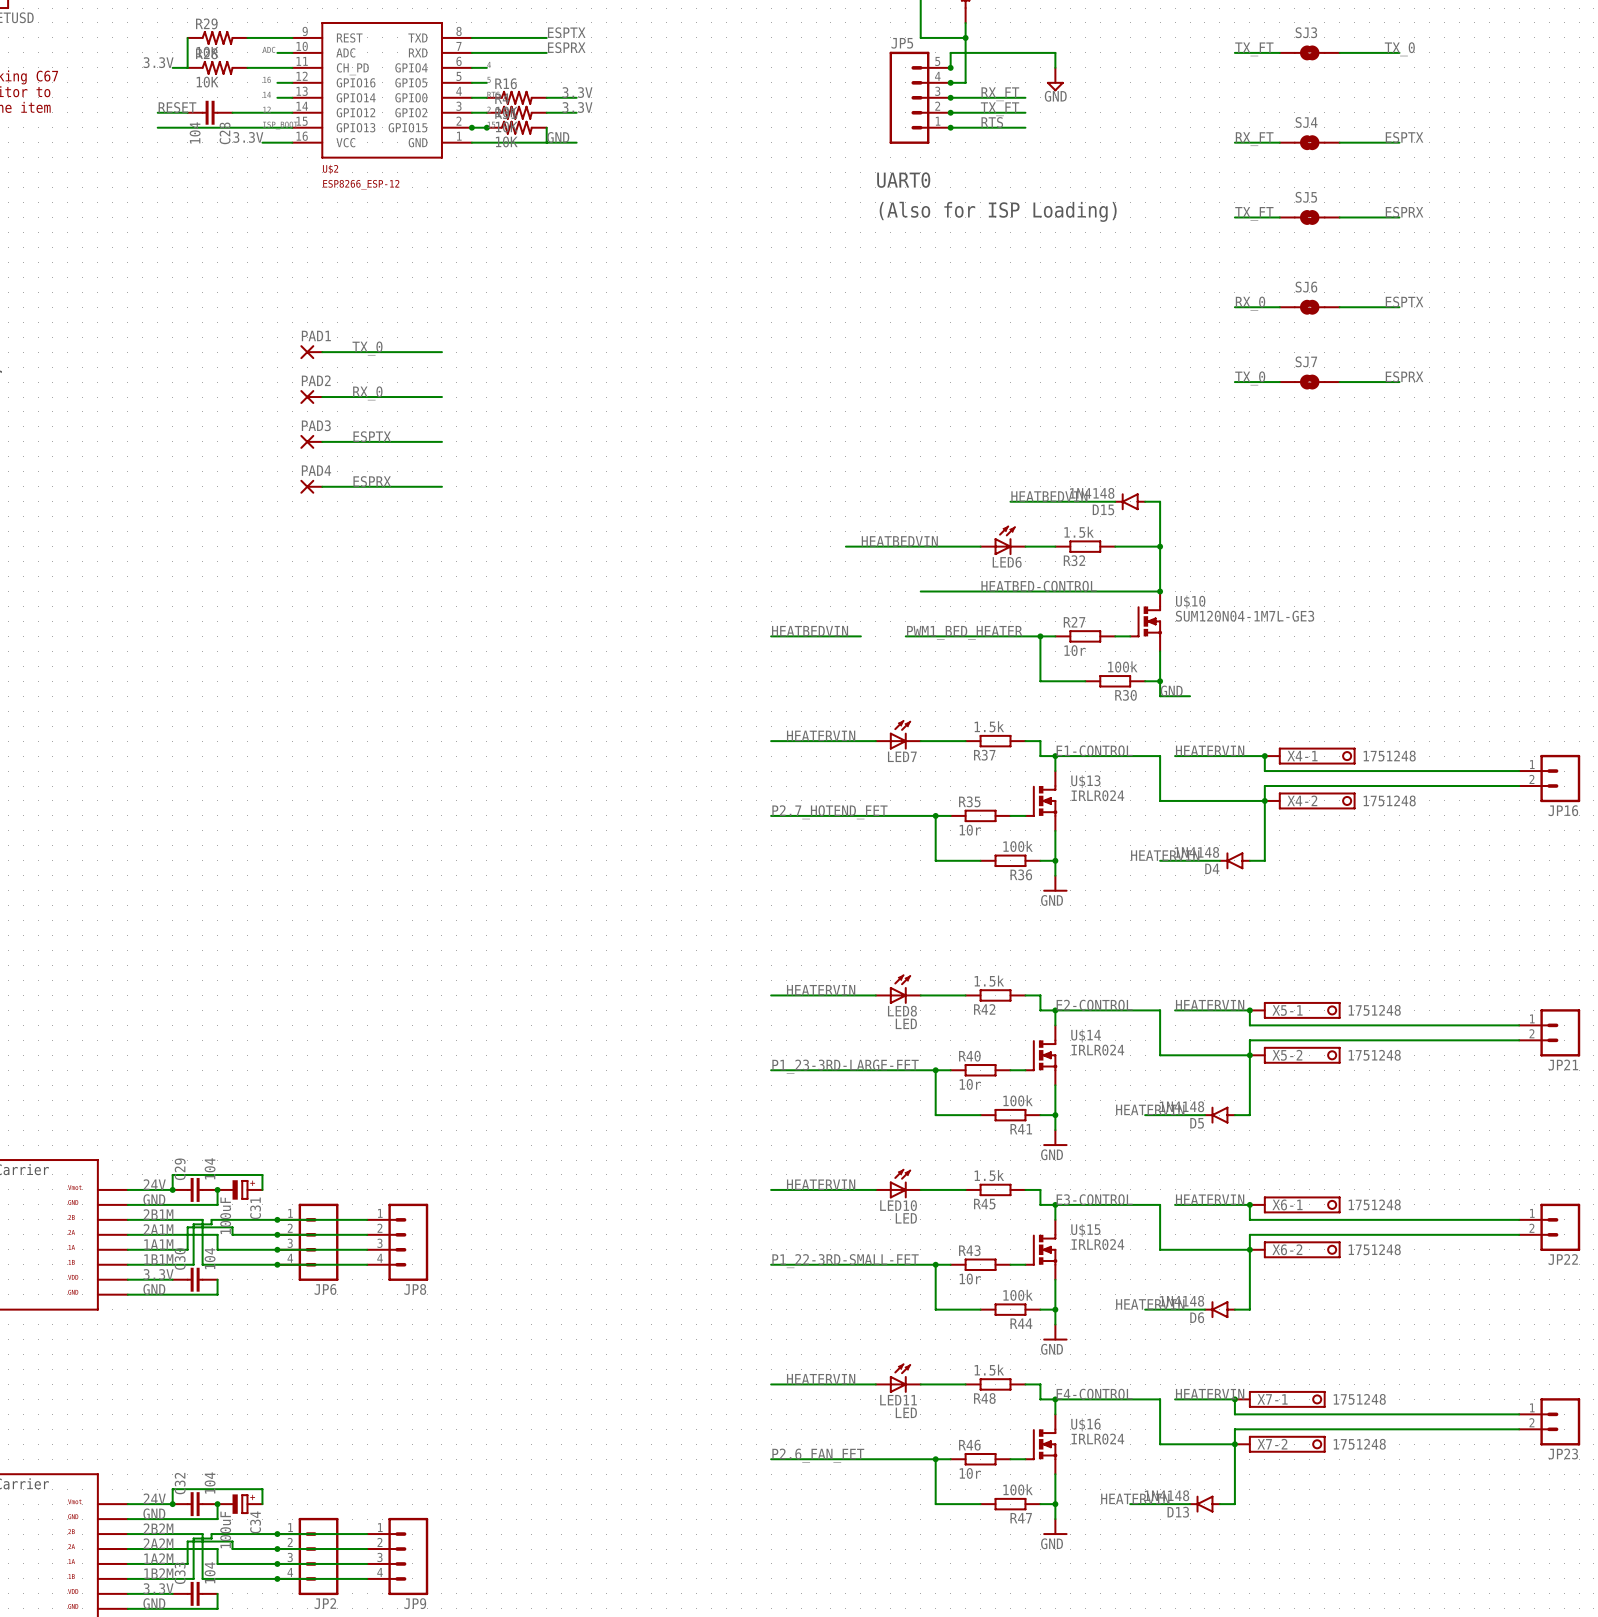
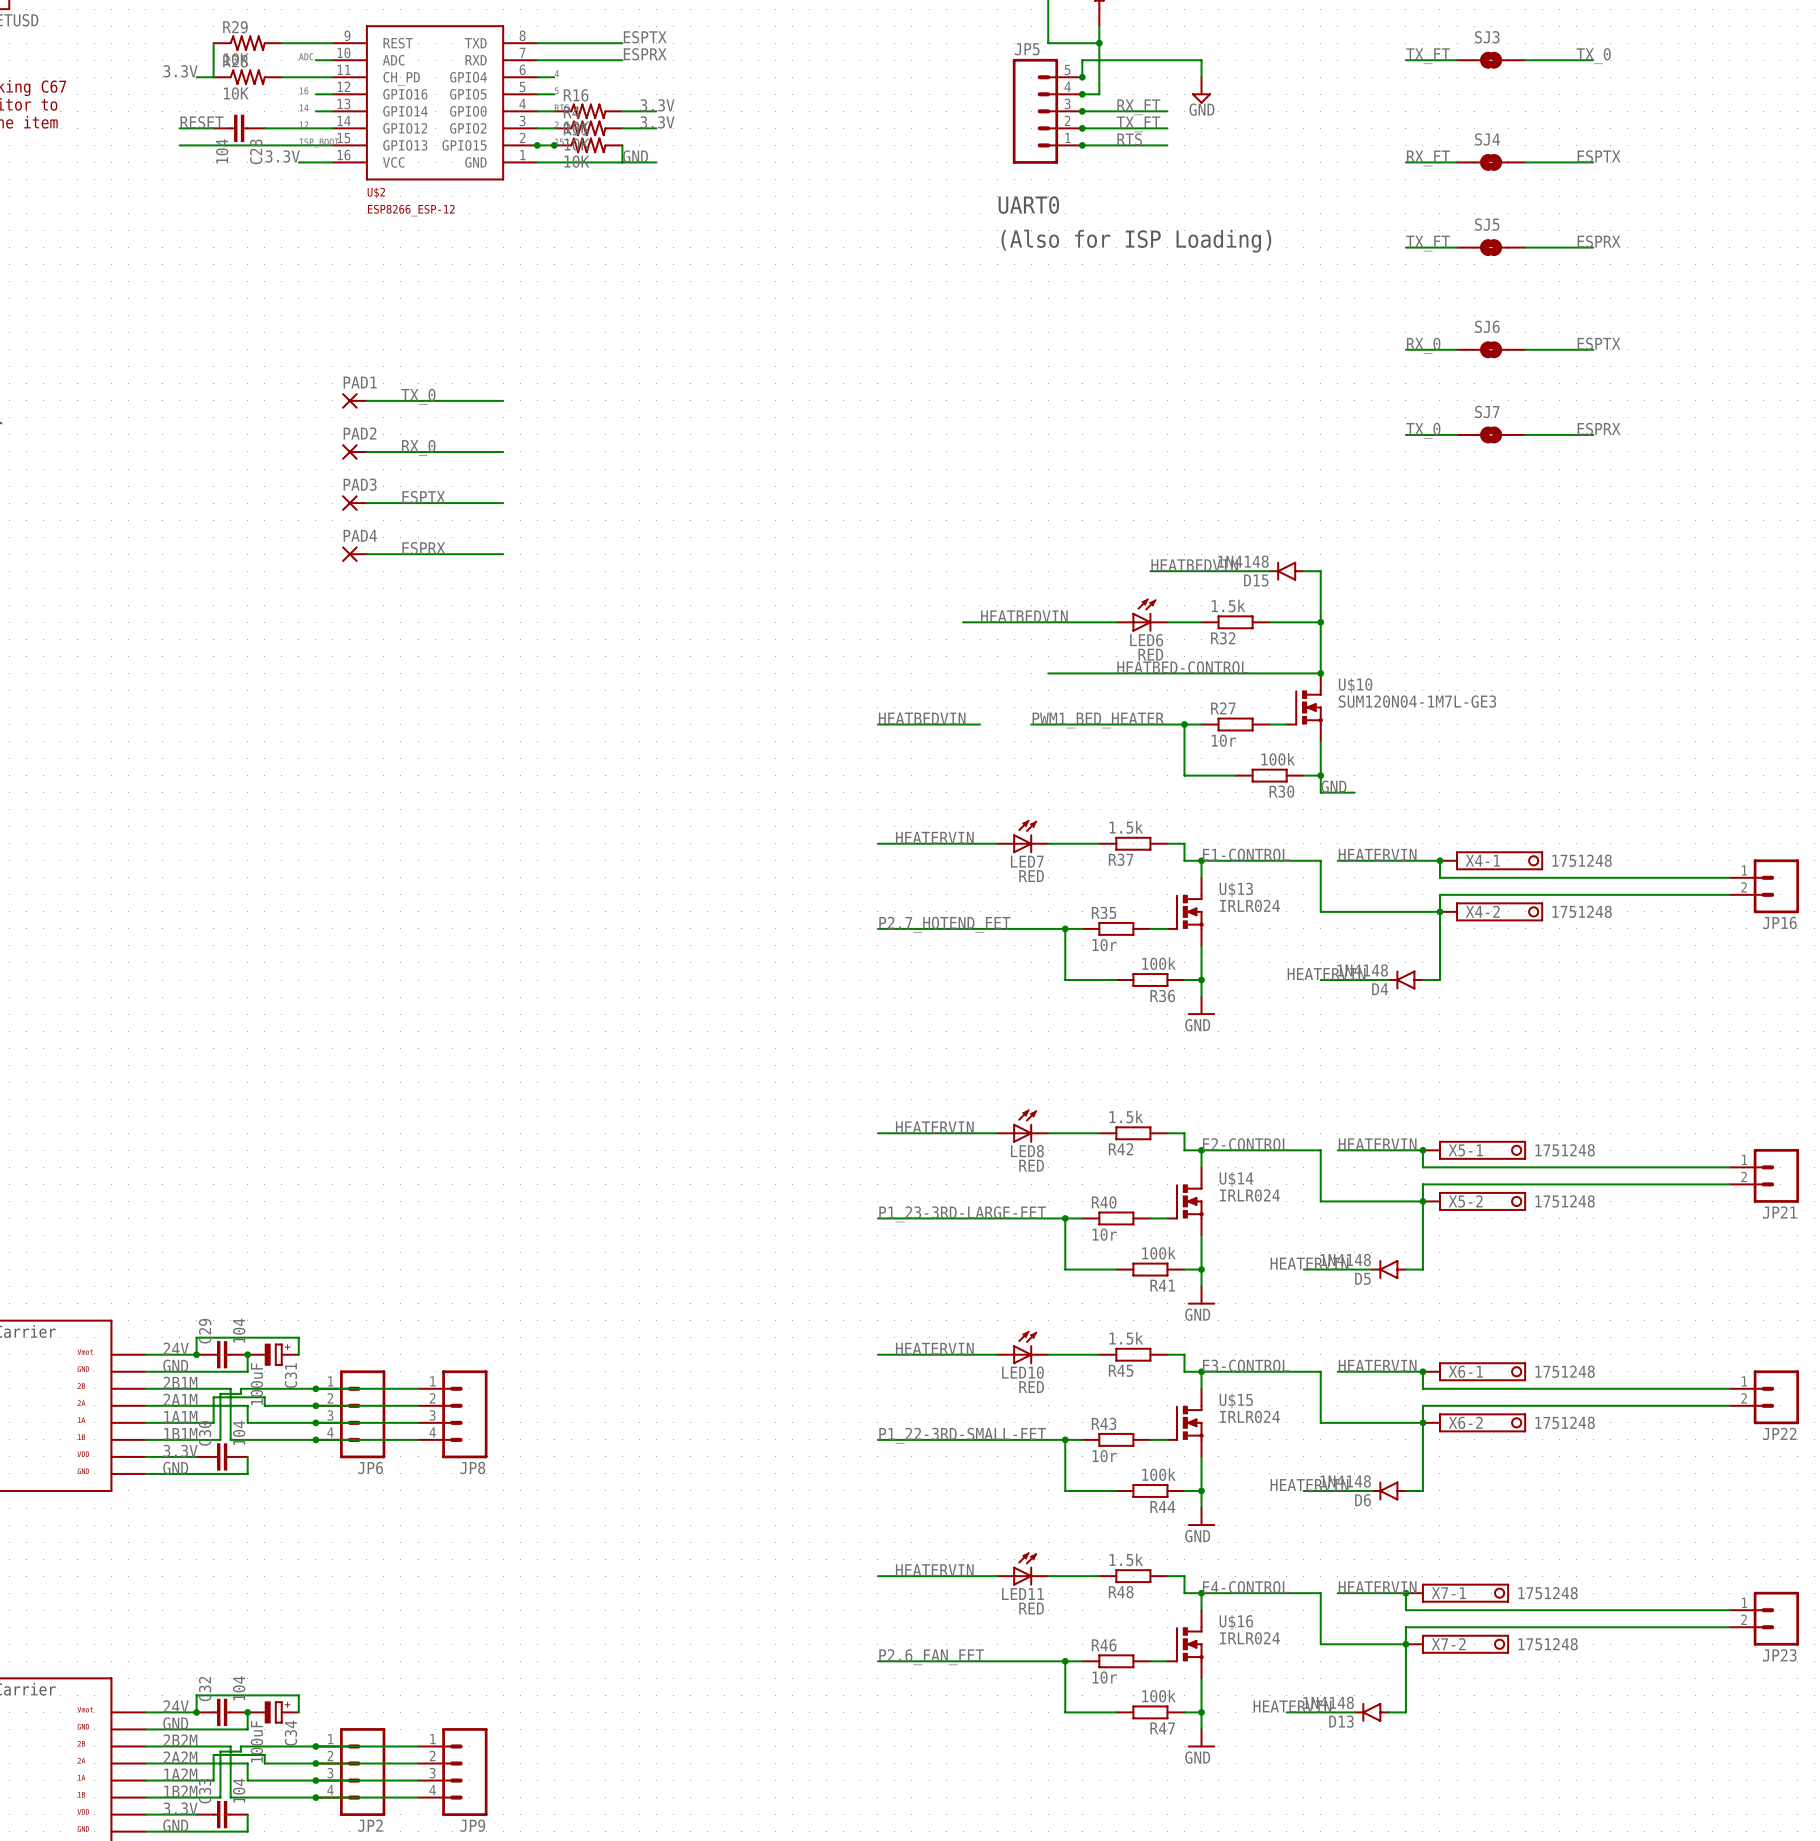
LED6 value: none -> RED (1150, 654)
LED7 value: none -> RED (1031, 876)
LED8 value: LED (906, 1023) -> RED (1031, 1165)
LED10 value: LED (906, 1218) -> RED (1031, 1387)
LED11 value: LED (906, 1412) -> RED (1031, 1608)

